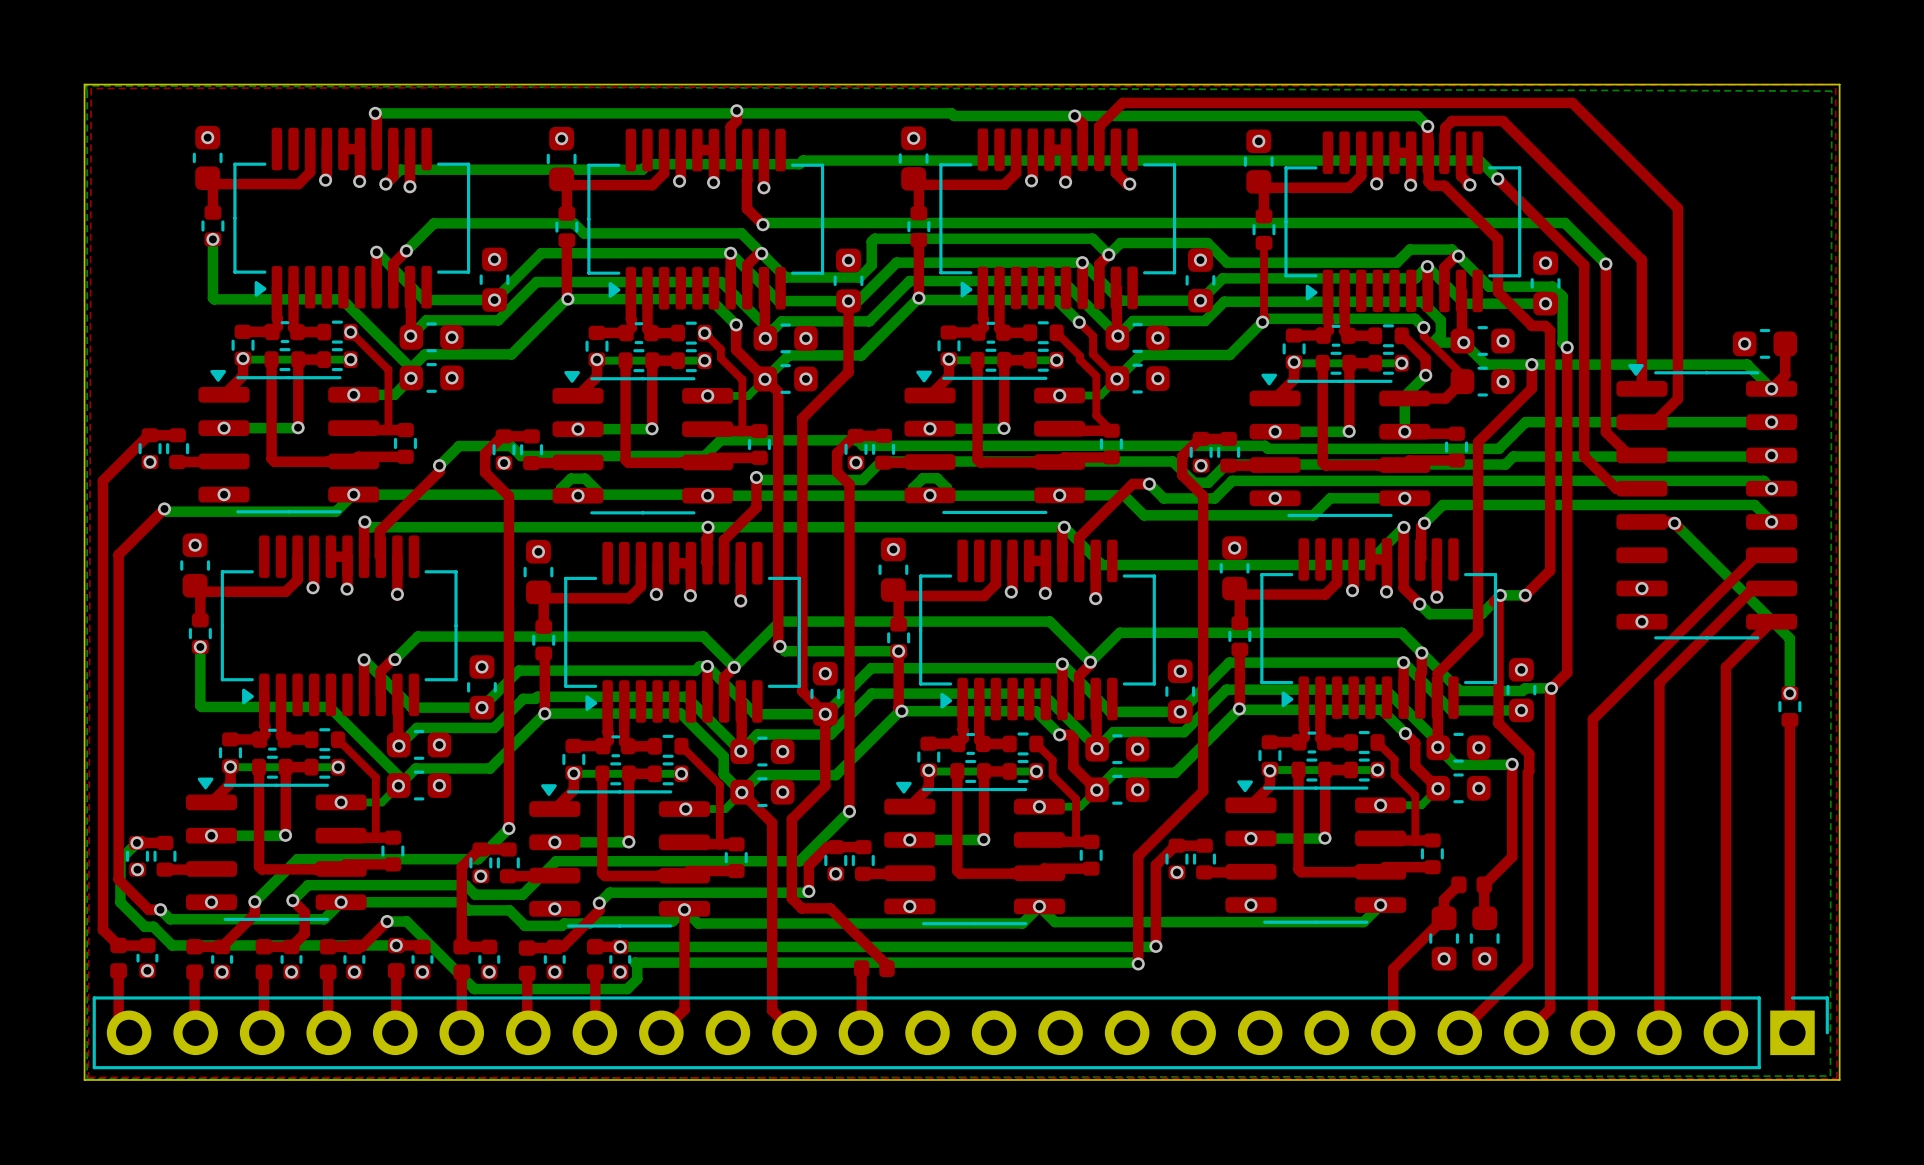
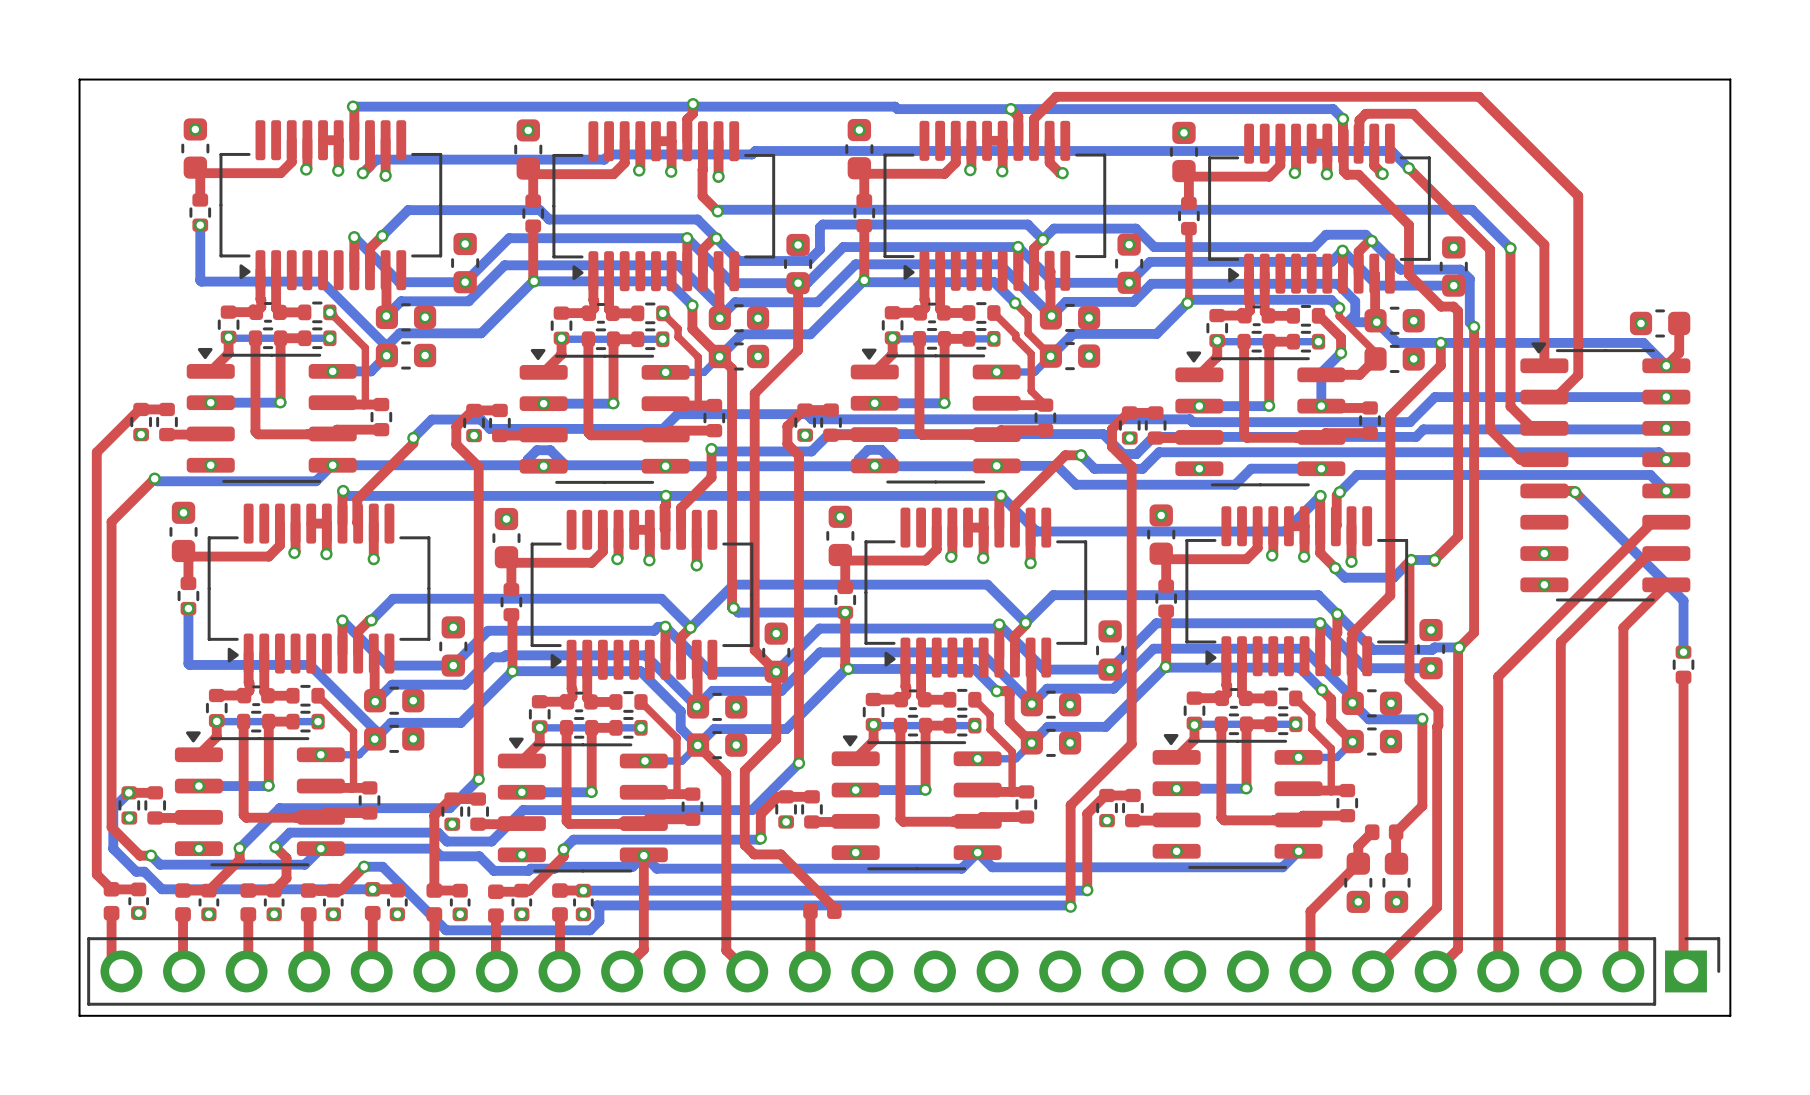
top zone outline: (1835, 84) (1837, 1078) (88, 1077) (91, 88) (1835, 84) -> none
bottom zone outline: (85, 85) (1831, 91) (1830, 1076) (87, 1078) (85, 85) -> none

